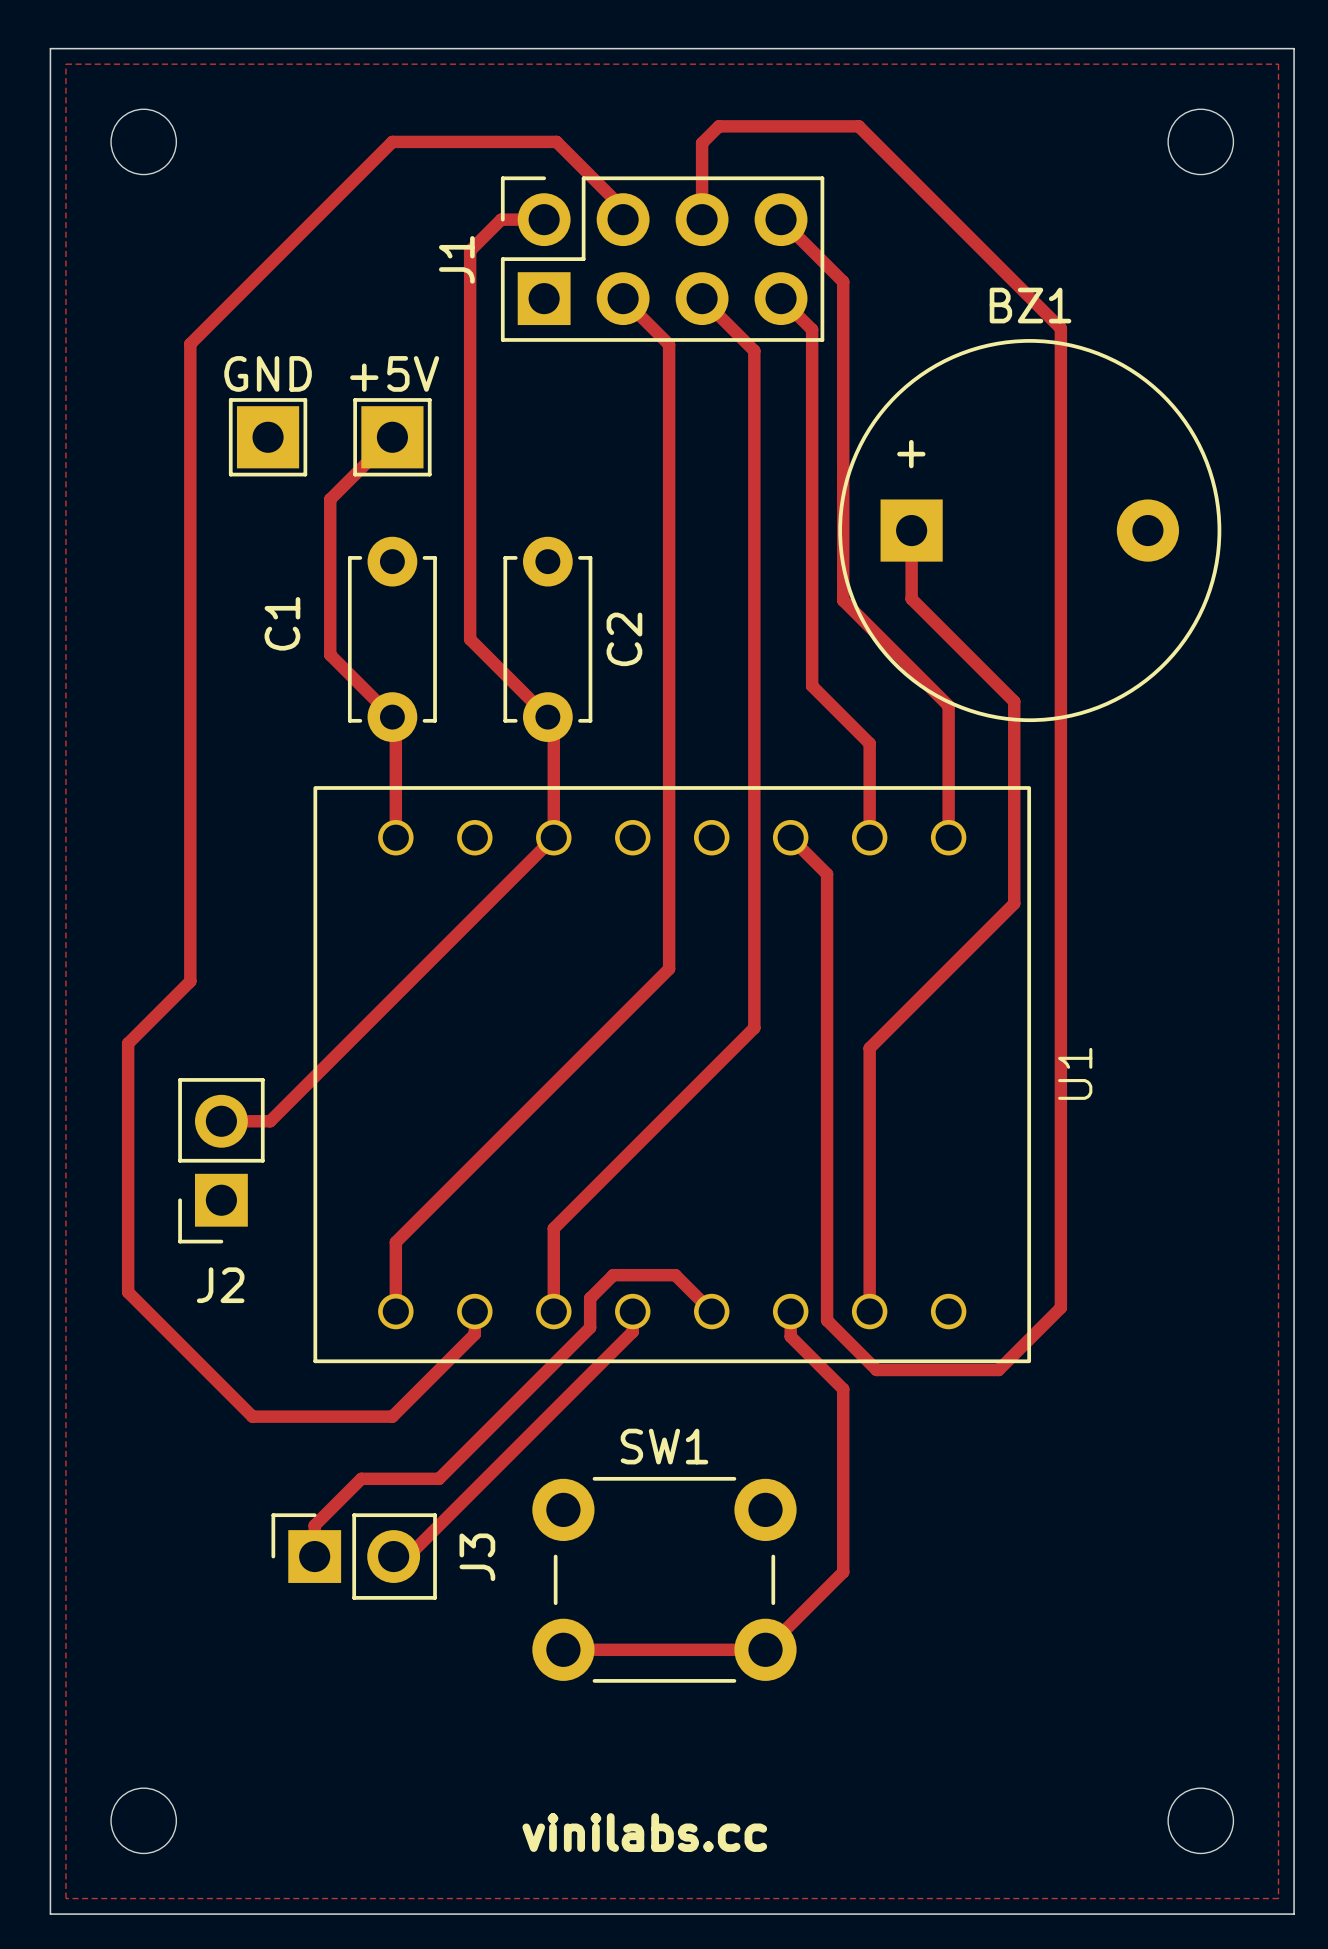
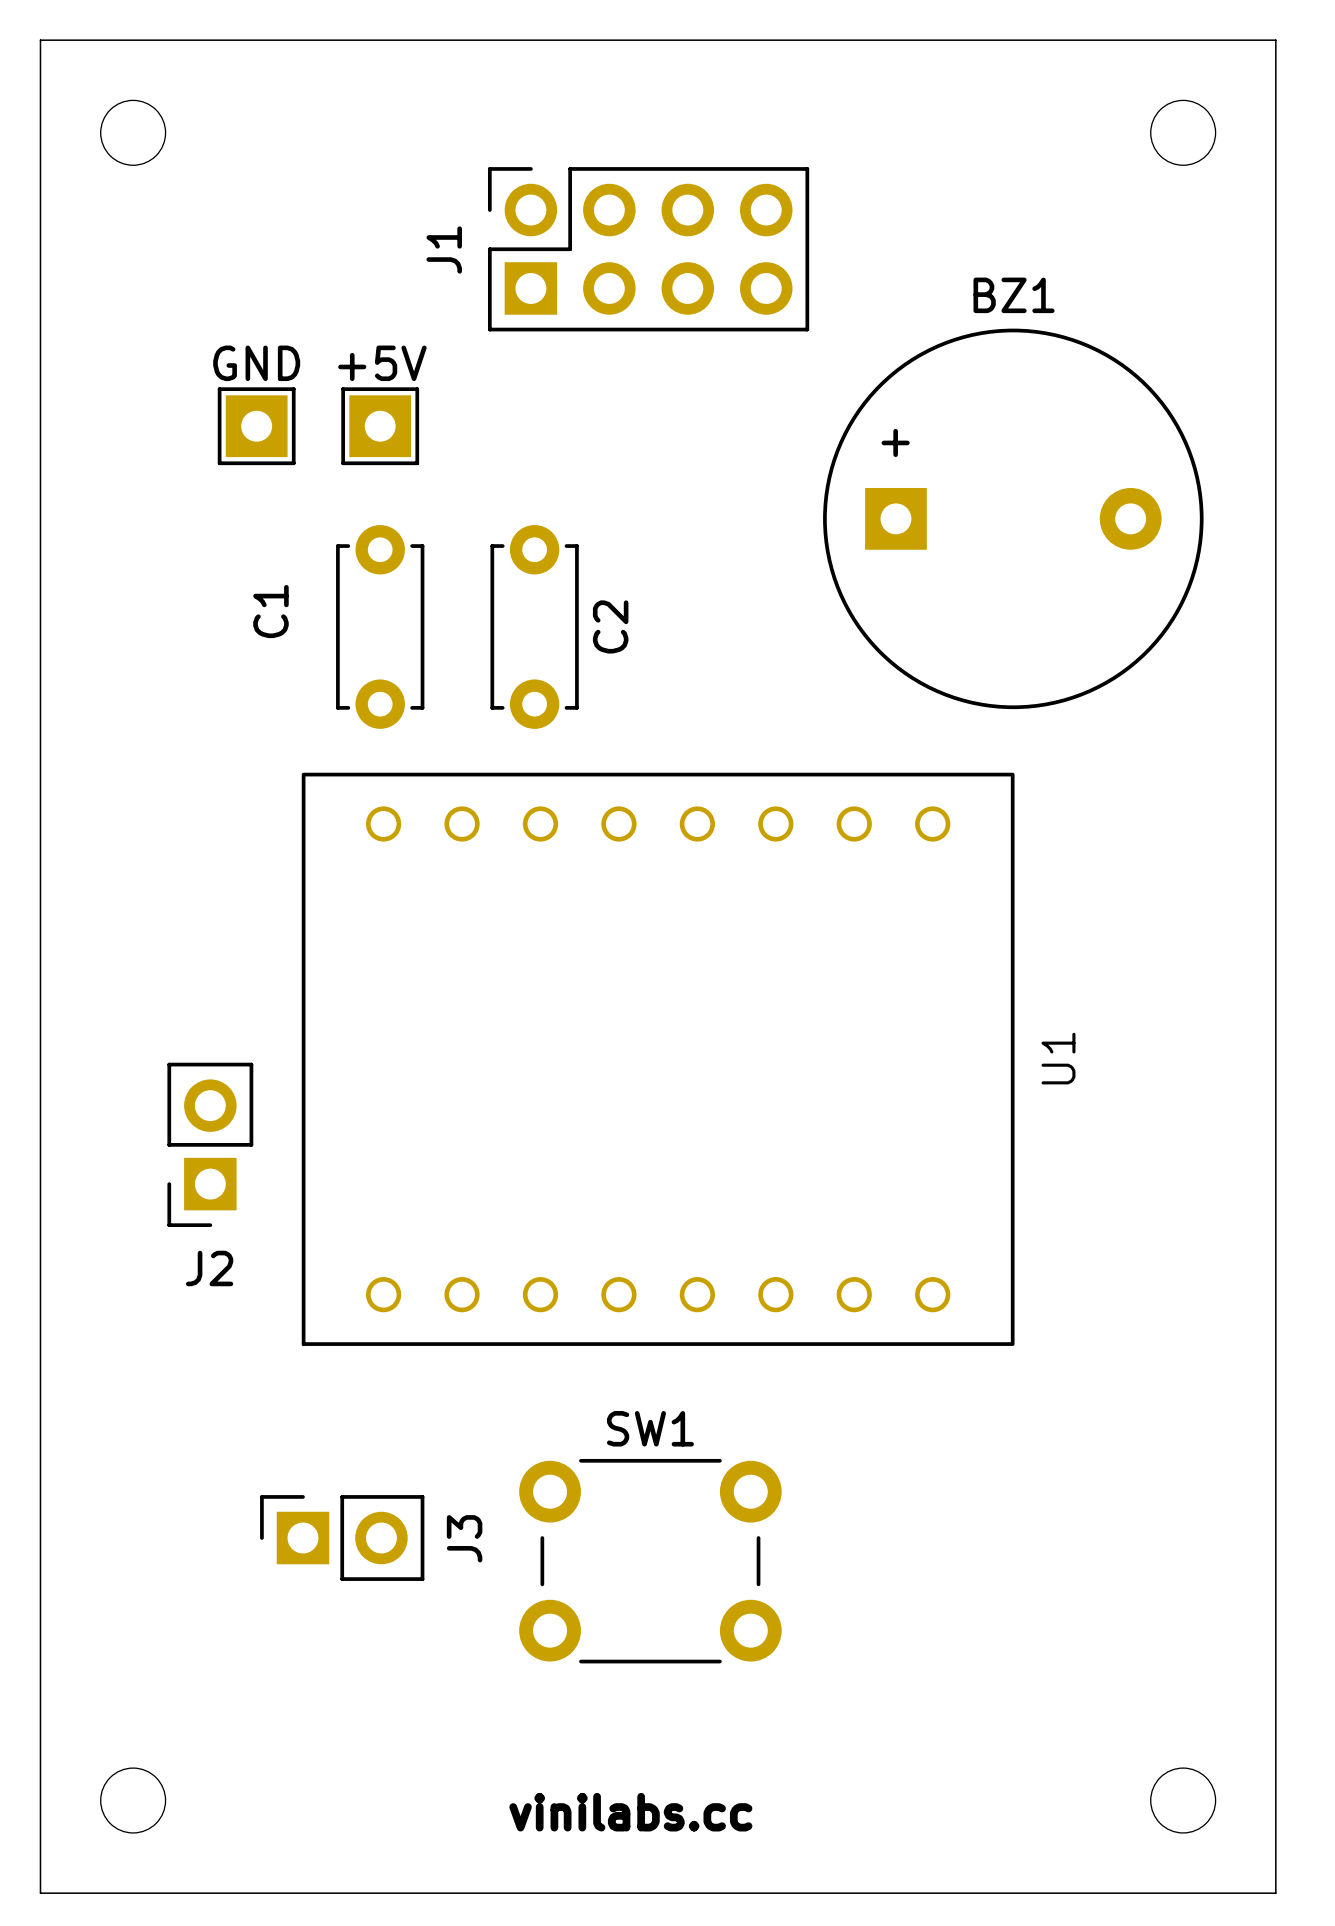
zone outline: (65, 64) (1278, 64) (1278, 1898) (65, 1898) (65, 64) -> none
track: (544, 219) (501, 219) (470, 250) (470, 639) (553, 723) (553, 837) (270, 1121) (221, 1121) -> none
track: (623, 219) (623, 208) (556, 141) (392, 141) (190, 344) (190, 981) (128, 1043) (128, 1292) (252, 1416) (392, 1416) (474, 1334) (474, 1311) -> none
track: (702, 219) (702, 143) (718, 126) (858, 126) (1060, 328) (1060, 1307) (998, 1370) (876, 1370) (827, 1320) (827, 874) (790, 837) -> none
track: (781, 219) (843, 281) (843, 600) (948, 705) (948, 837) -> none
track: (623, 298) (669, 344) (669, 968) (395, 1242) (395, 1311) -> none
track: (702, 298) (754, 350) (754, 1028) (553, 1228) (553, 1311) -> none
track: (781, 298) (812, 329) (812, 686) (869, 743) (869, 837) -> none
track: (392, 437) (330, 499) (330, 654) (395, 720) (395, 837) -> none
track: (911, 530) (911, 598) (1014, 701) (1014, 903) (869, 1048) (869, 1311) -> none
track: (632, 1311) (632, 1331) (407, 1556) (393, 1556) -> none
track: (711, 1311) (675, 1275) (613, 1275) (590, 1298) (590, 1327) (439, 1478) (361, 1478) (314, 1525) (314, 1556) -> none
track: (790, 1311) (790, 1336) (843, 1389) (843, 1572) (765, 1649) (563, 1649) -> none

